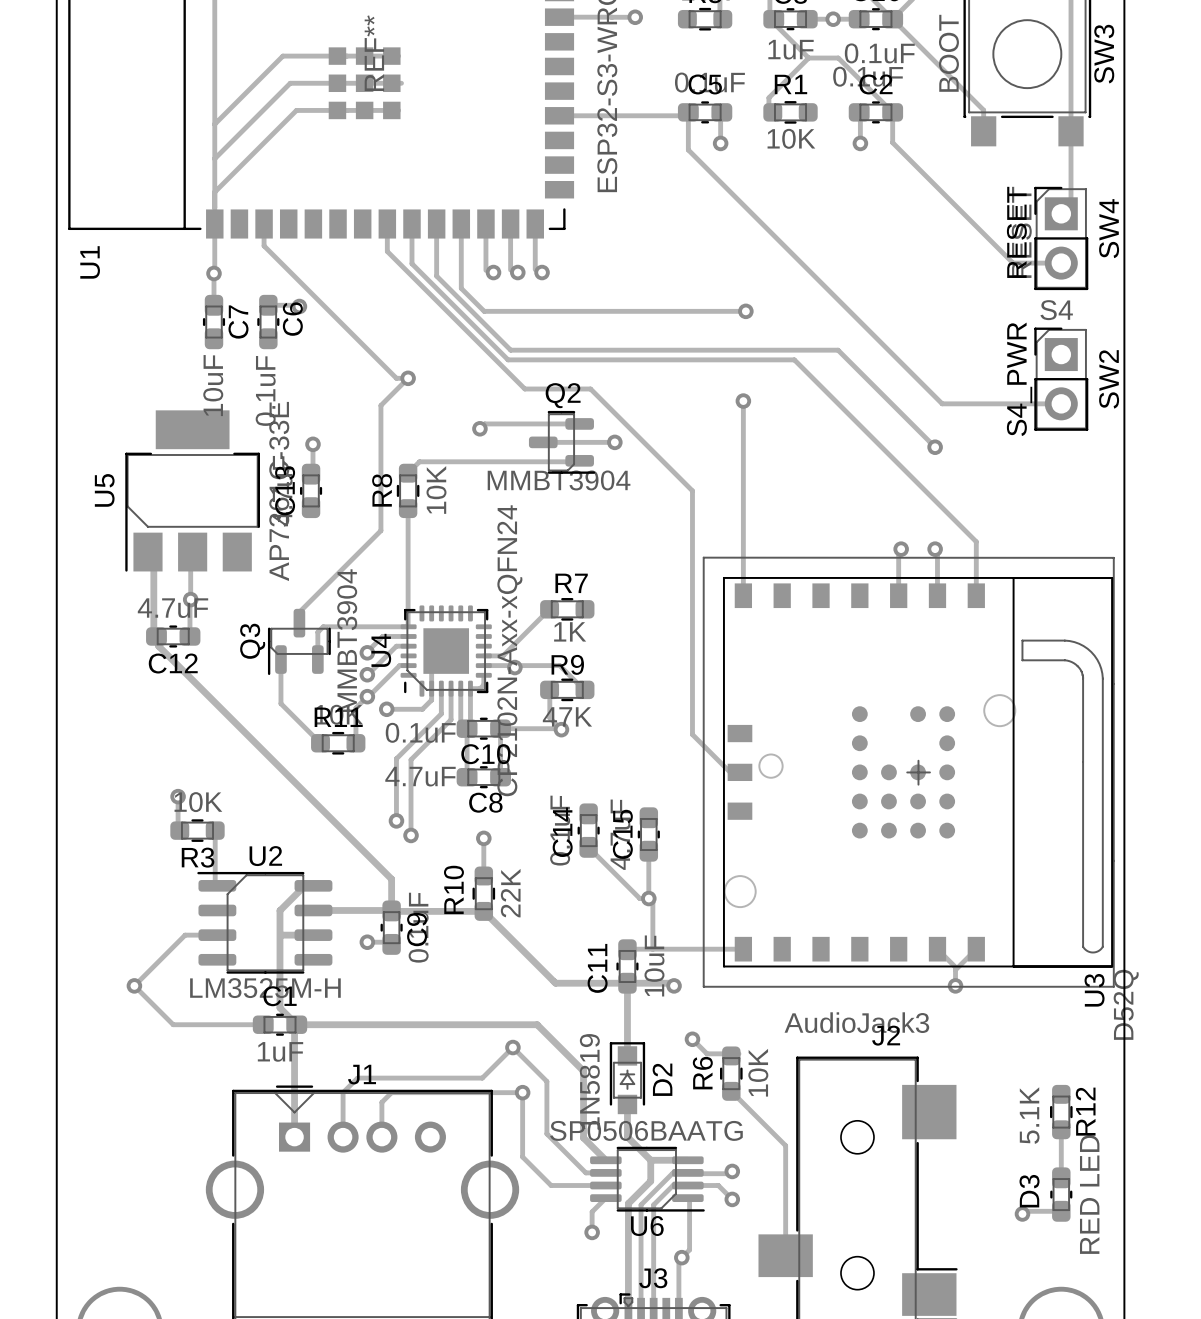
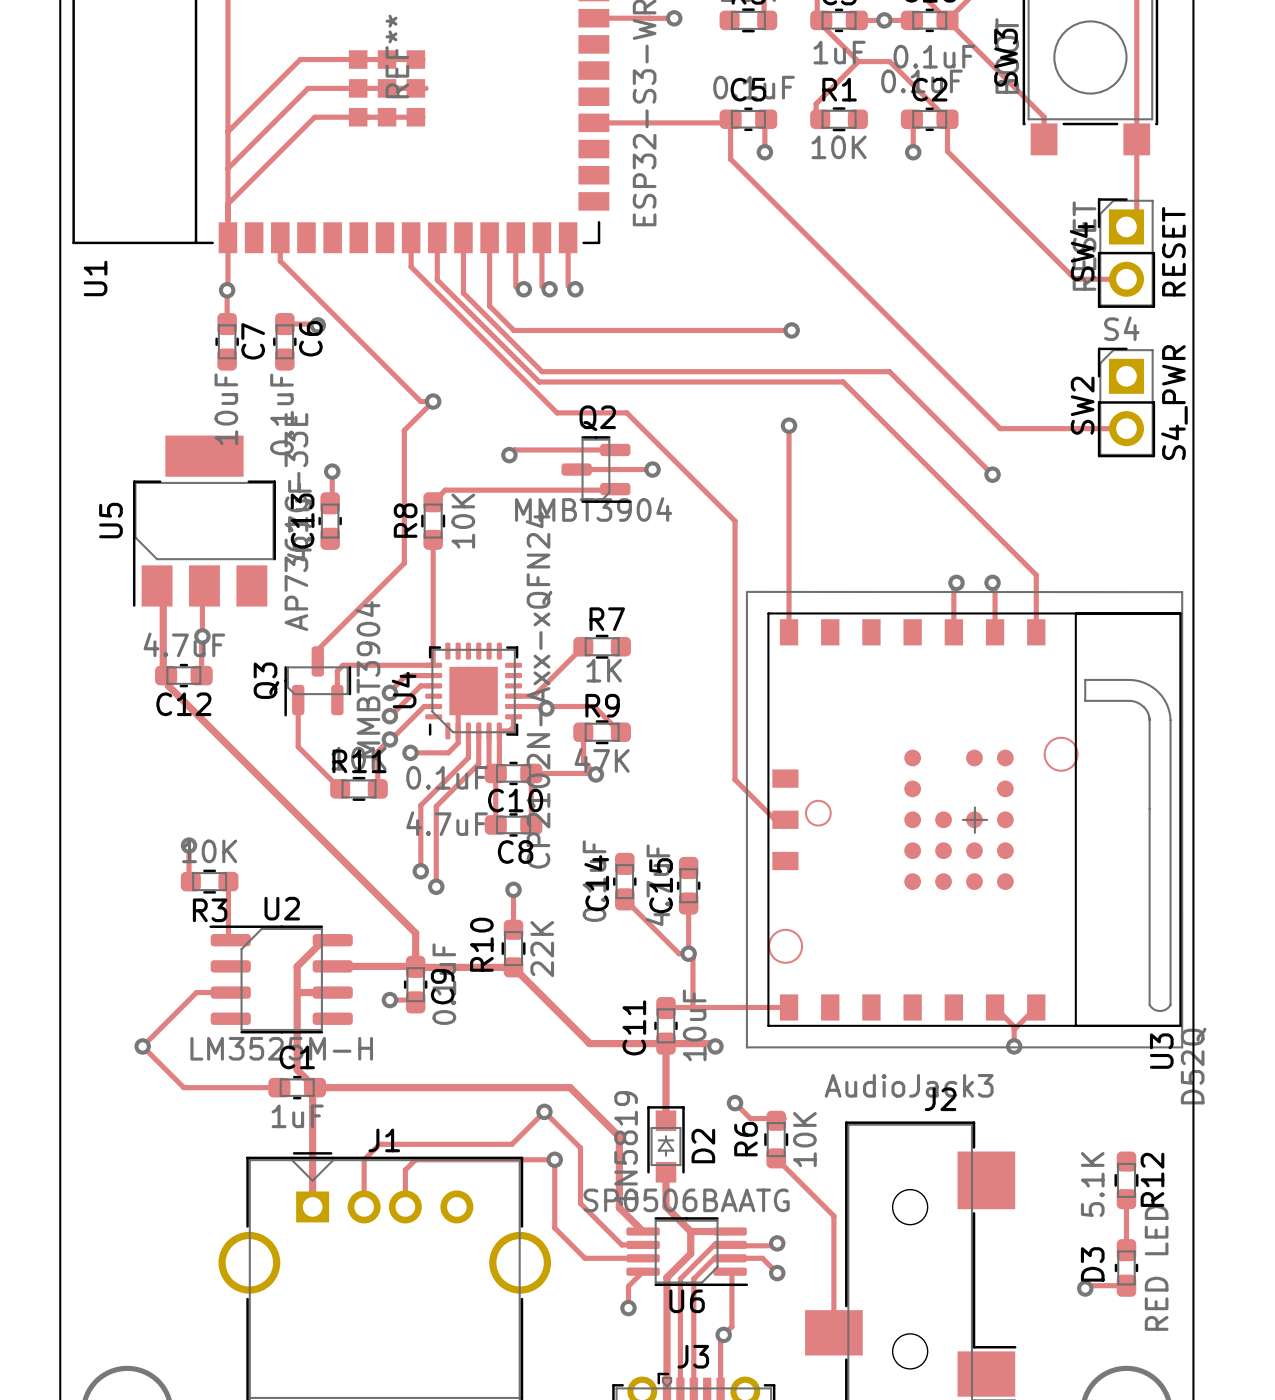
SW3 name position: SW3 (1104, 54) -> SW3 (1006, 57)
SW4 name position: SW4 (1109, 228) -> SW4 (1082, 251)
text position: RESET (1016, 232) -> RESET (1173, 251)
text position: S4_PWR (1019, 379) -> S4_PWR (1174, 402)
SW2 name position: SW2 (1109, 379) -> SW2 (1082, 405)

